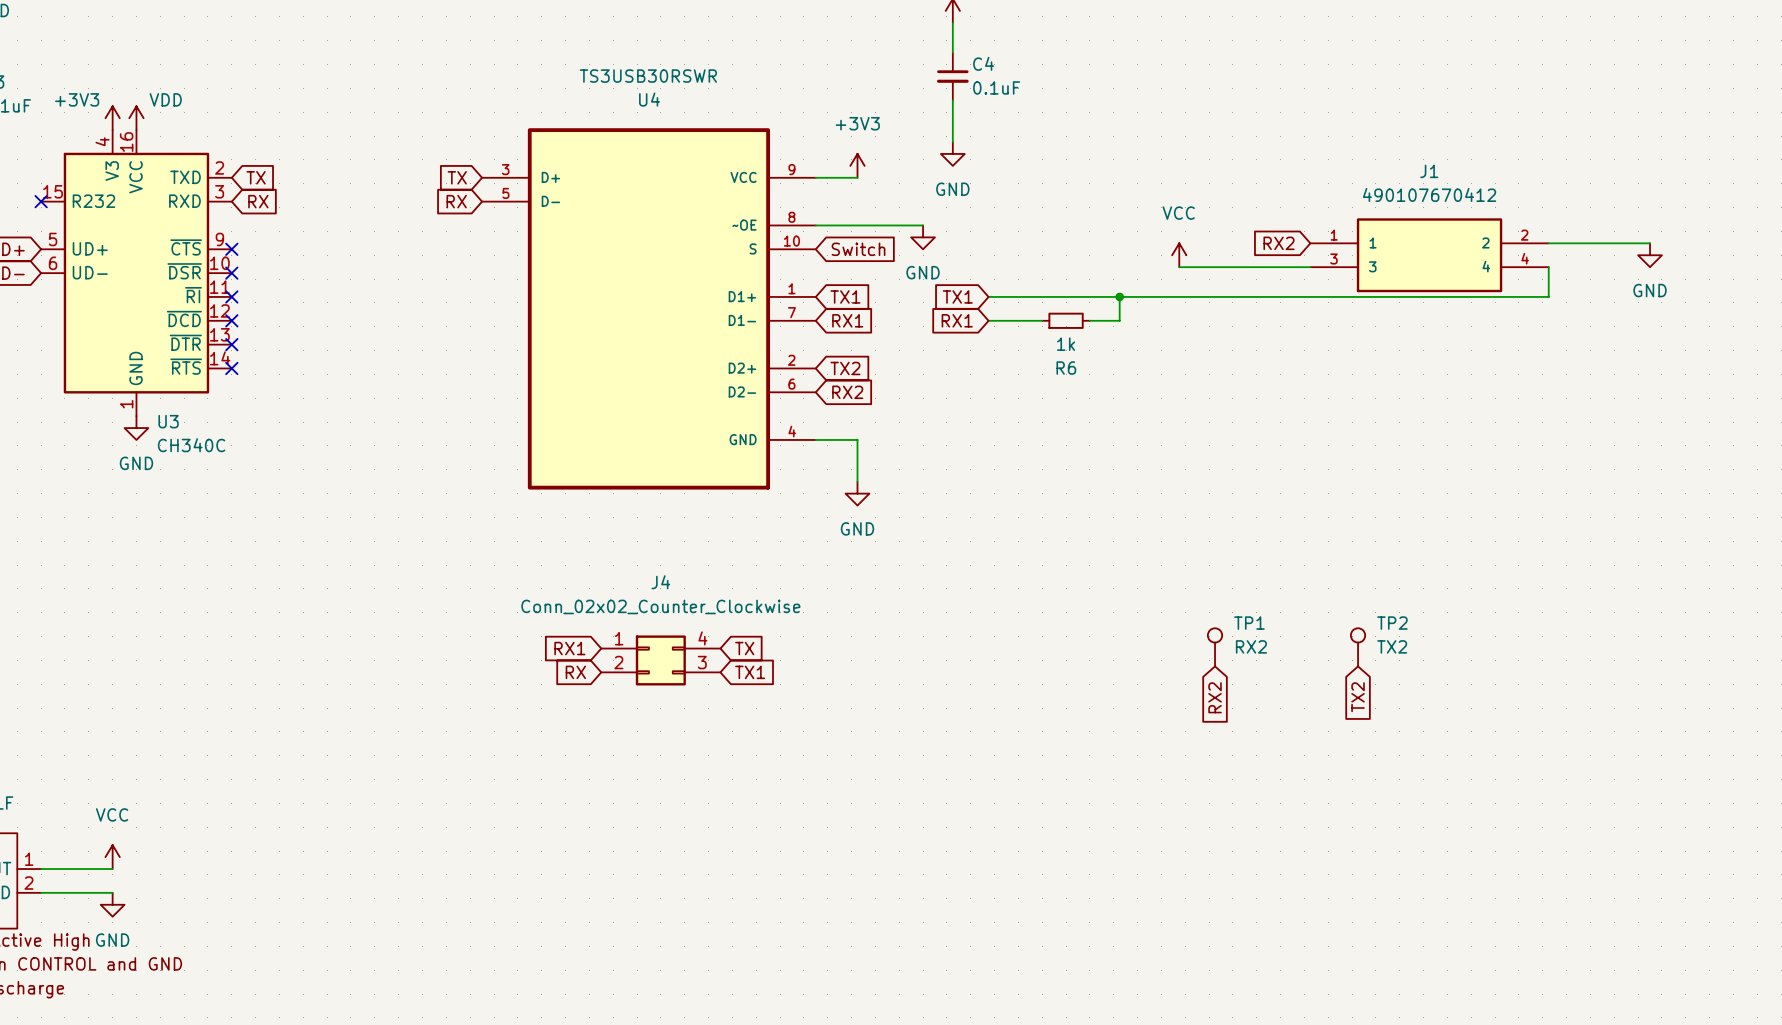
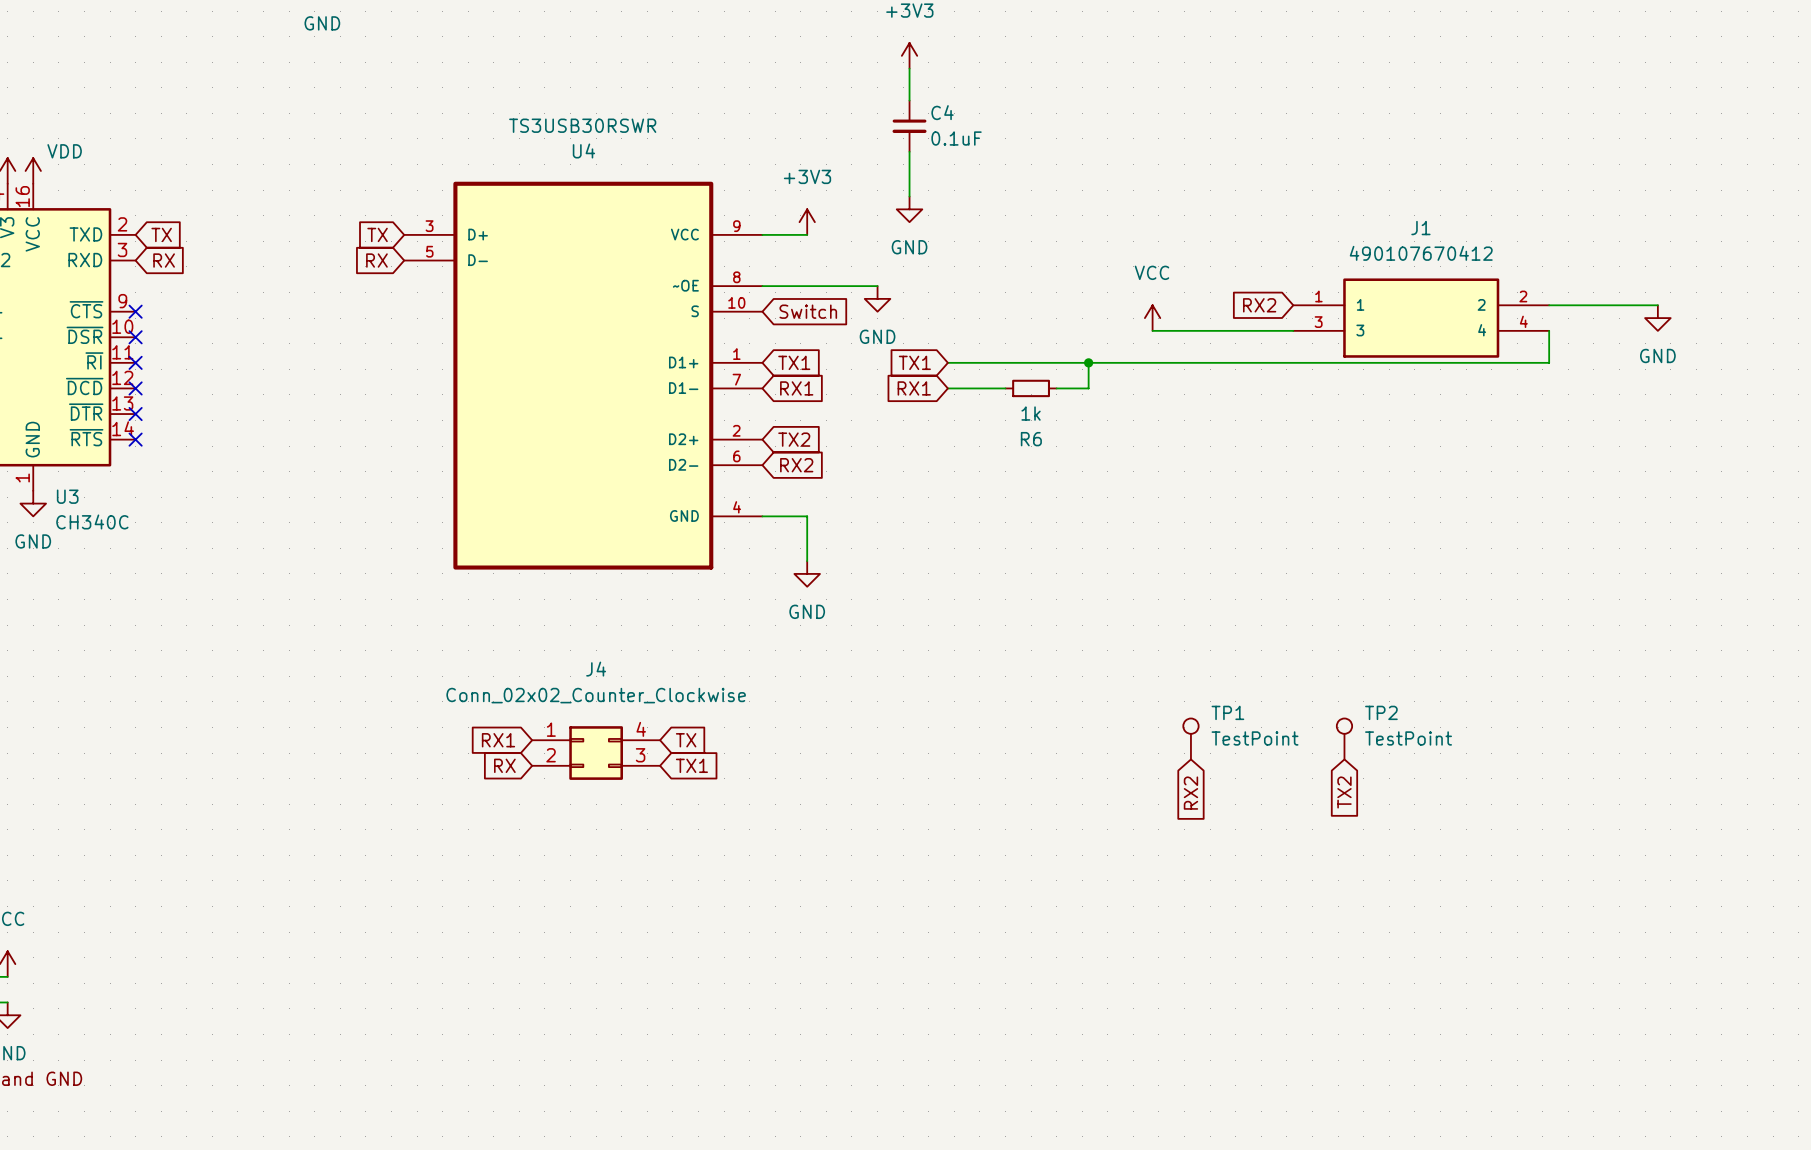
TP1 value: RX2 (1251, 646) -> TestPoint (1255, 738)
TP2 value: TX2 (1392, 646) -> TestPoint (1408, 738)

